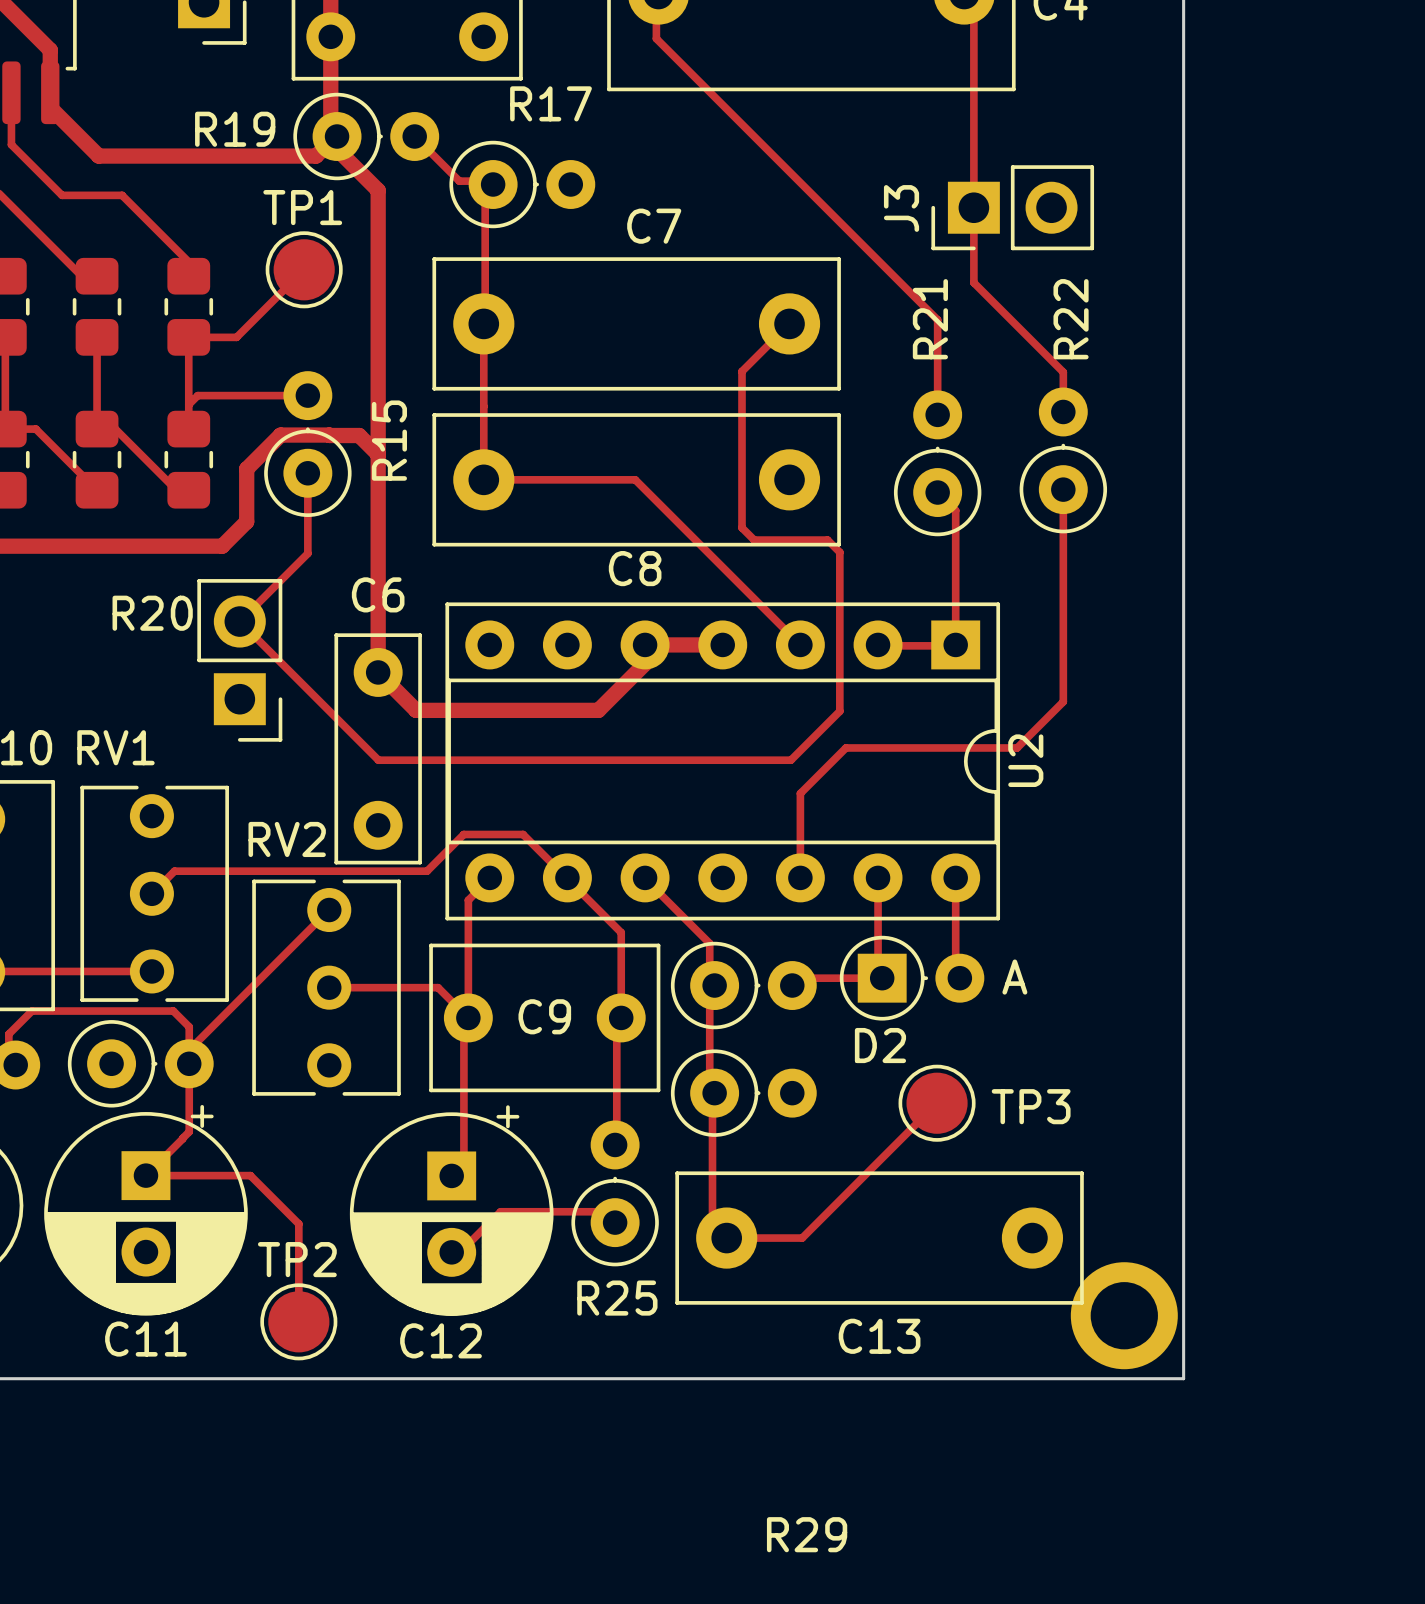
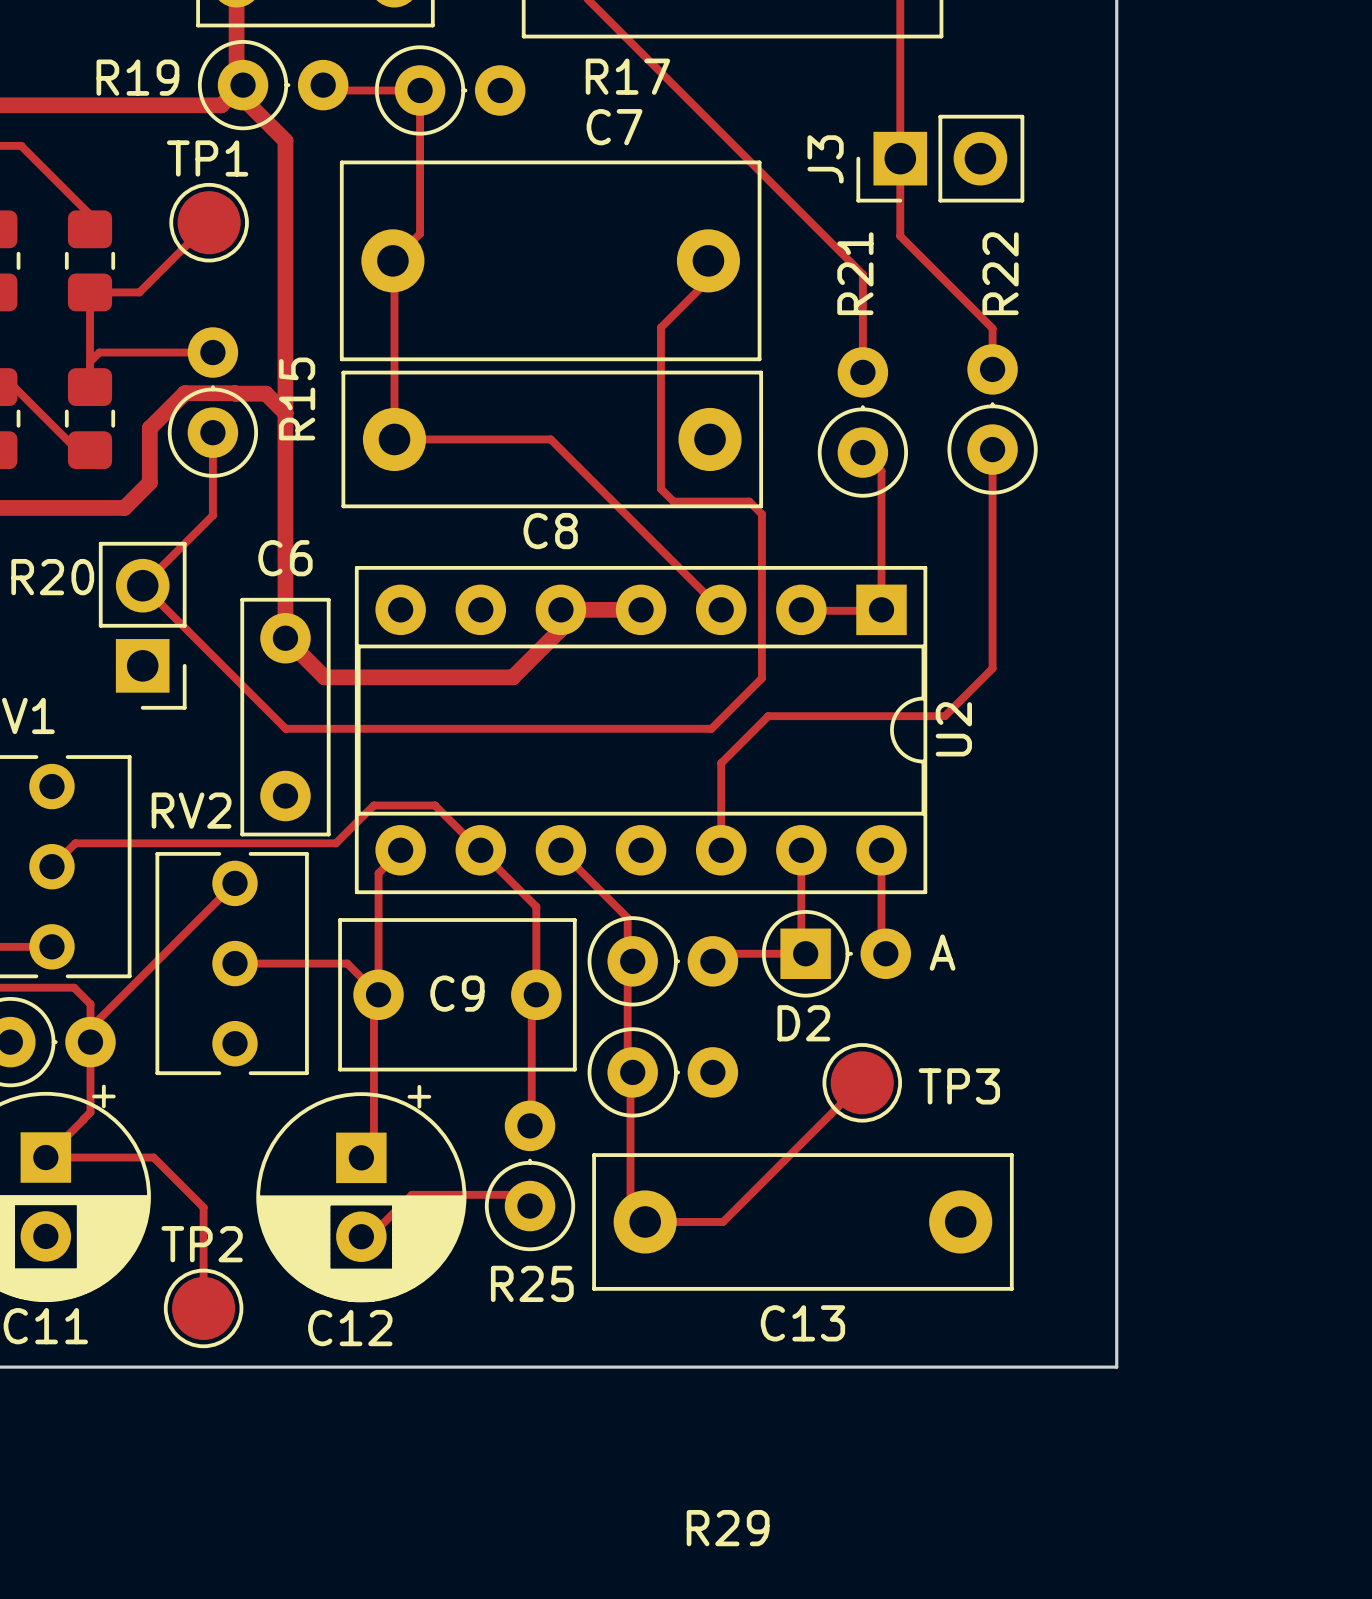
R17 name position: R17 (550, 103) -> R17 (627, 76)
top track: (419, 141) (459, 181) (485, 181) (483, 323) -> (328, 90) (420, 90) (420, 233) (392, 260) (394, 278)
R17 position: (522, 184) -> (450, 90)
C7 footprint: [432, 257, 841, 391] -> [339, 160, 762, 362]
part: (1124, 1315) -> none

